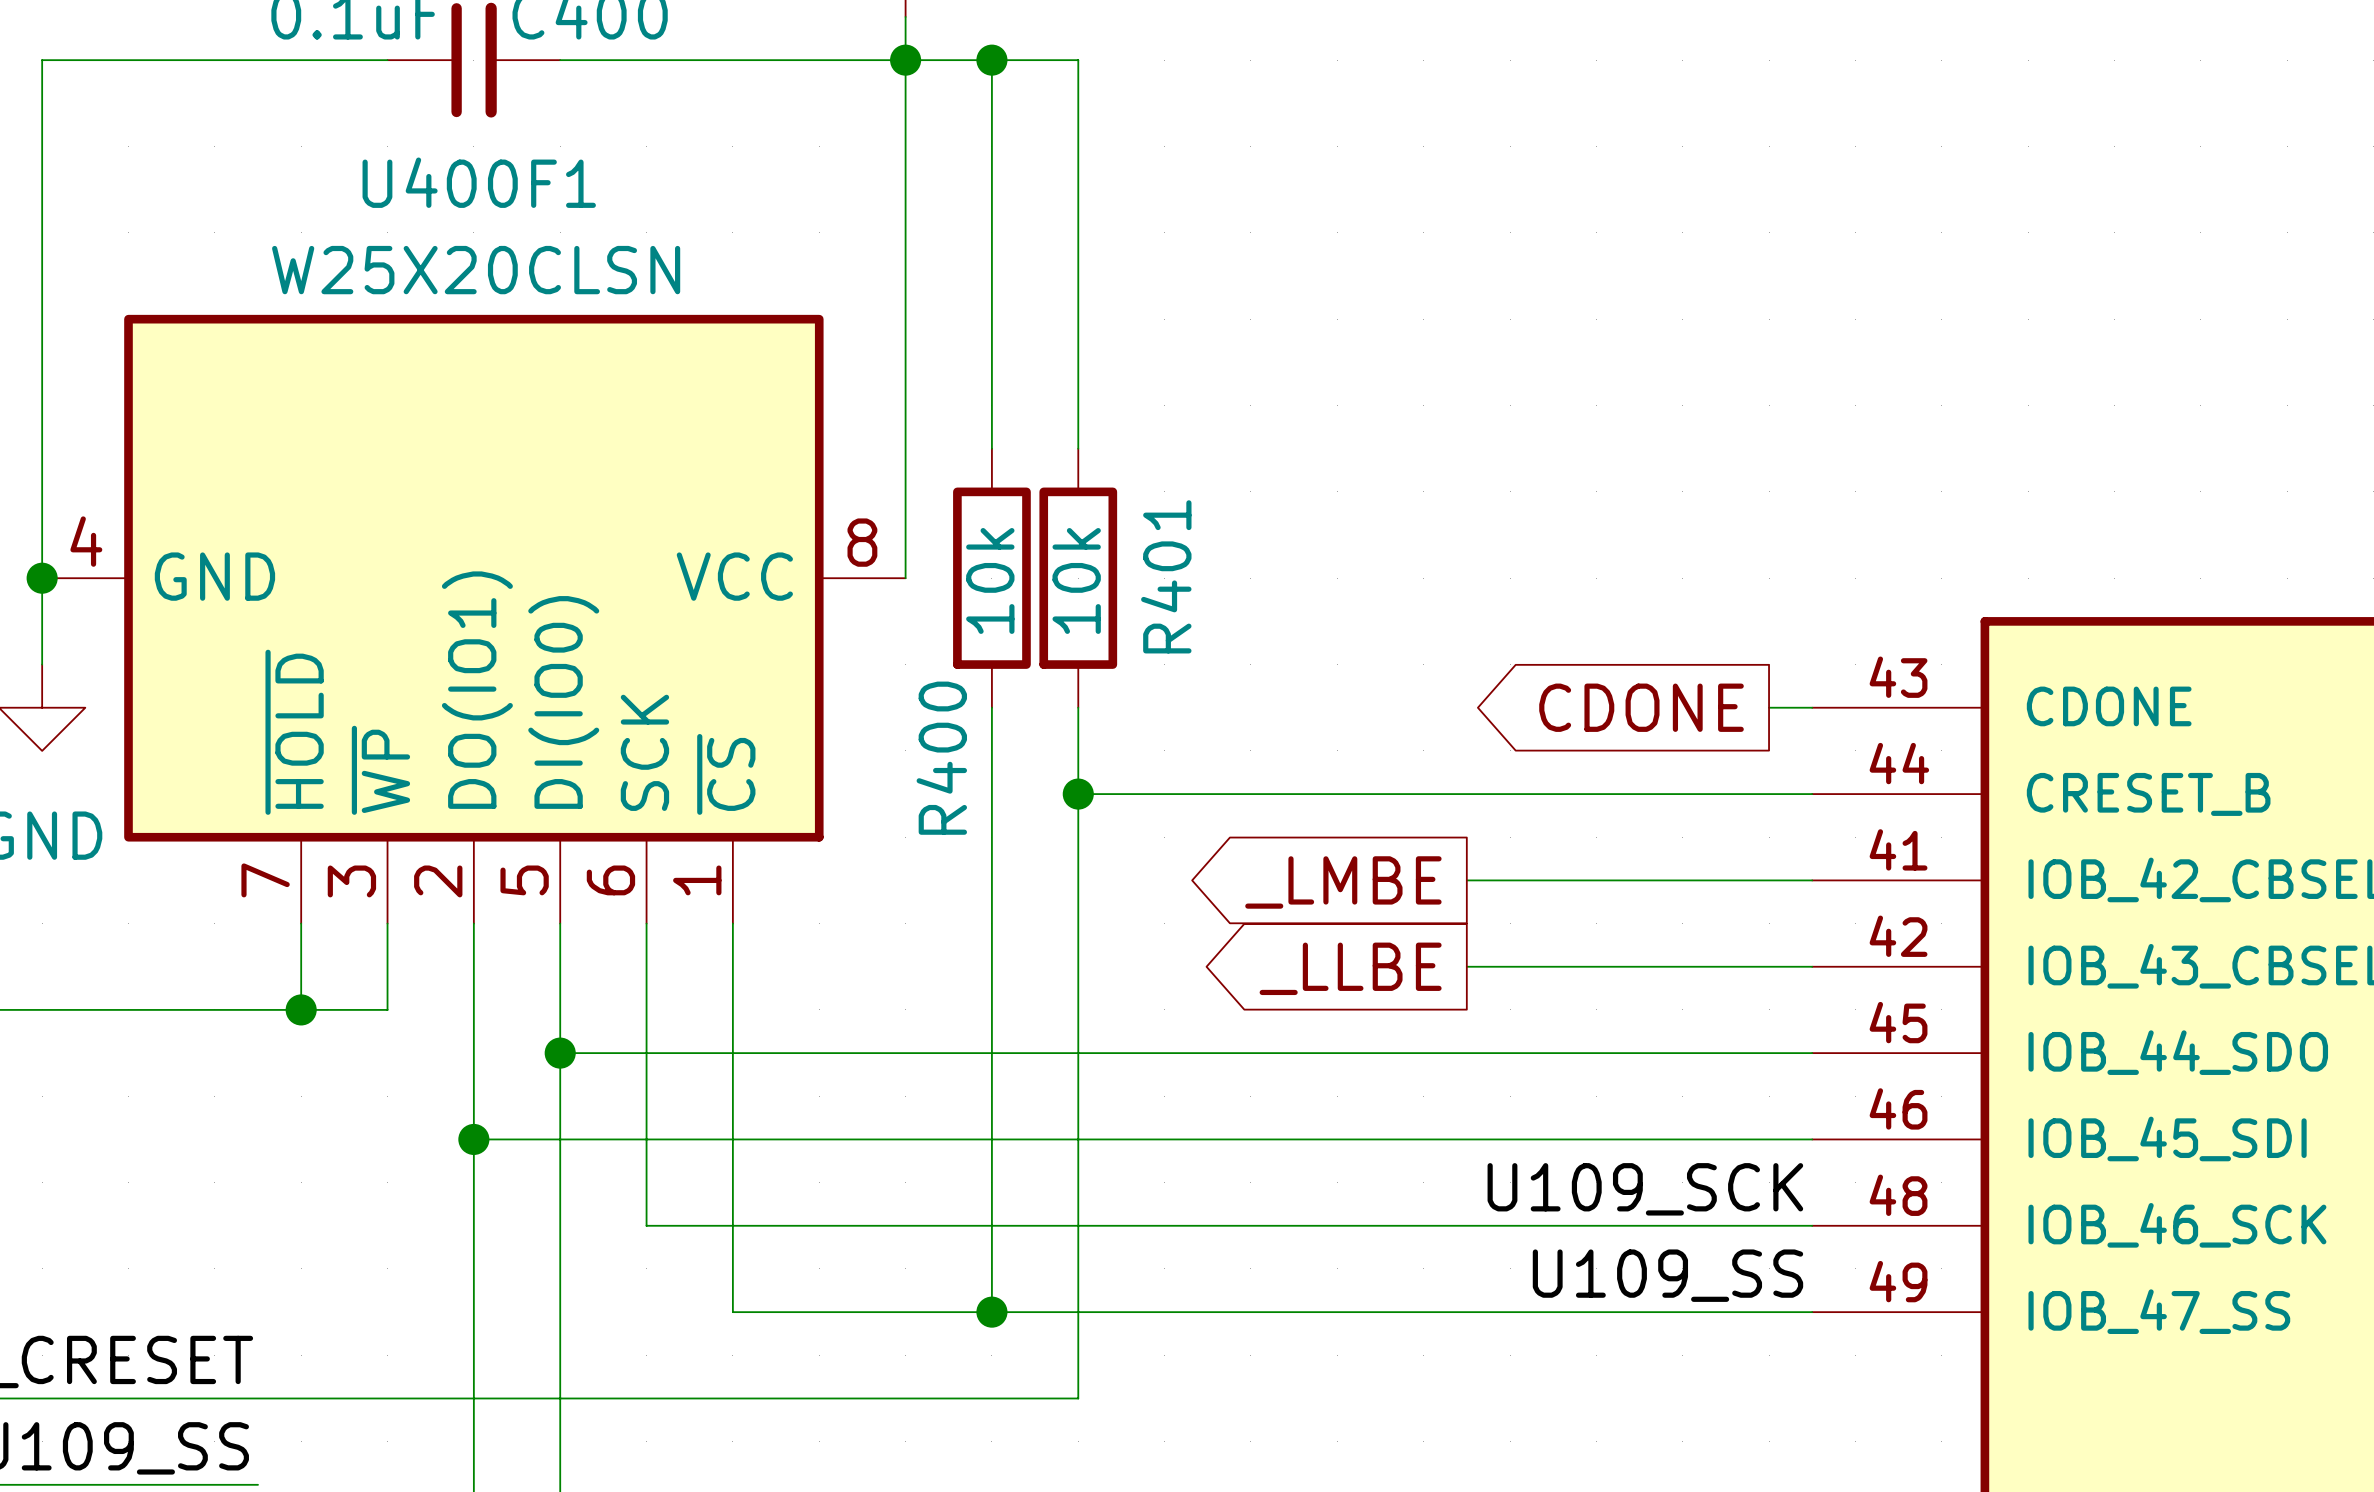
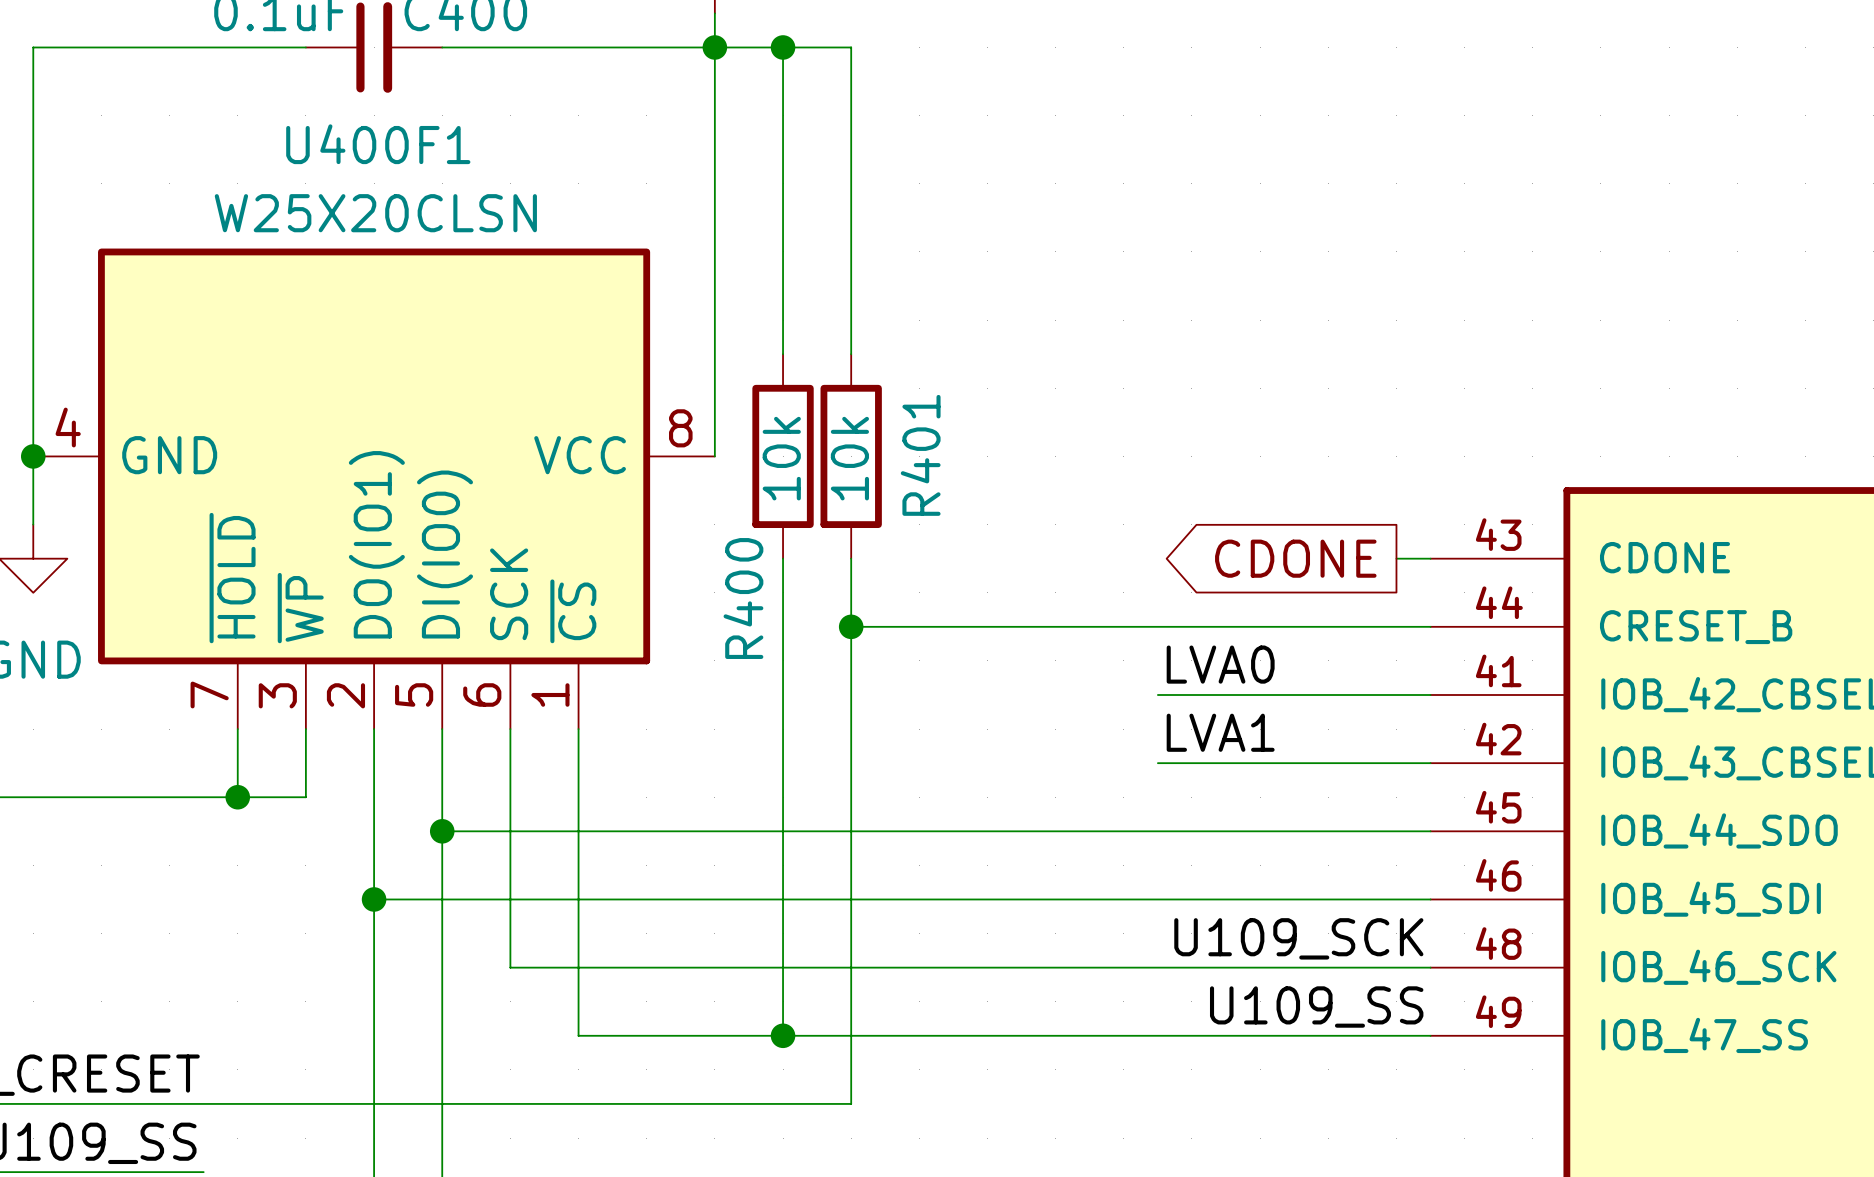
label: none -> LVA0 (1220, 664)
global label: _LMBE (1343, 882) -> none
label: none -> LVA1 (1220, 732)
global label: _LLBE (1350, 968) -> none

